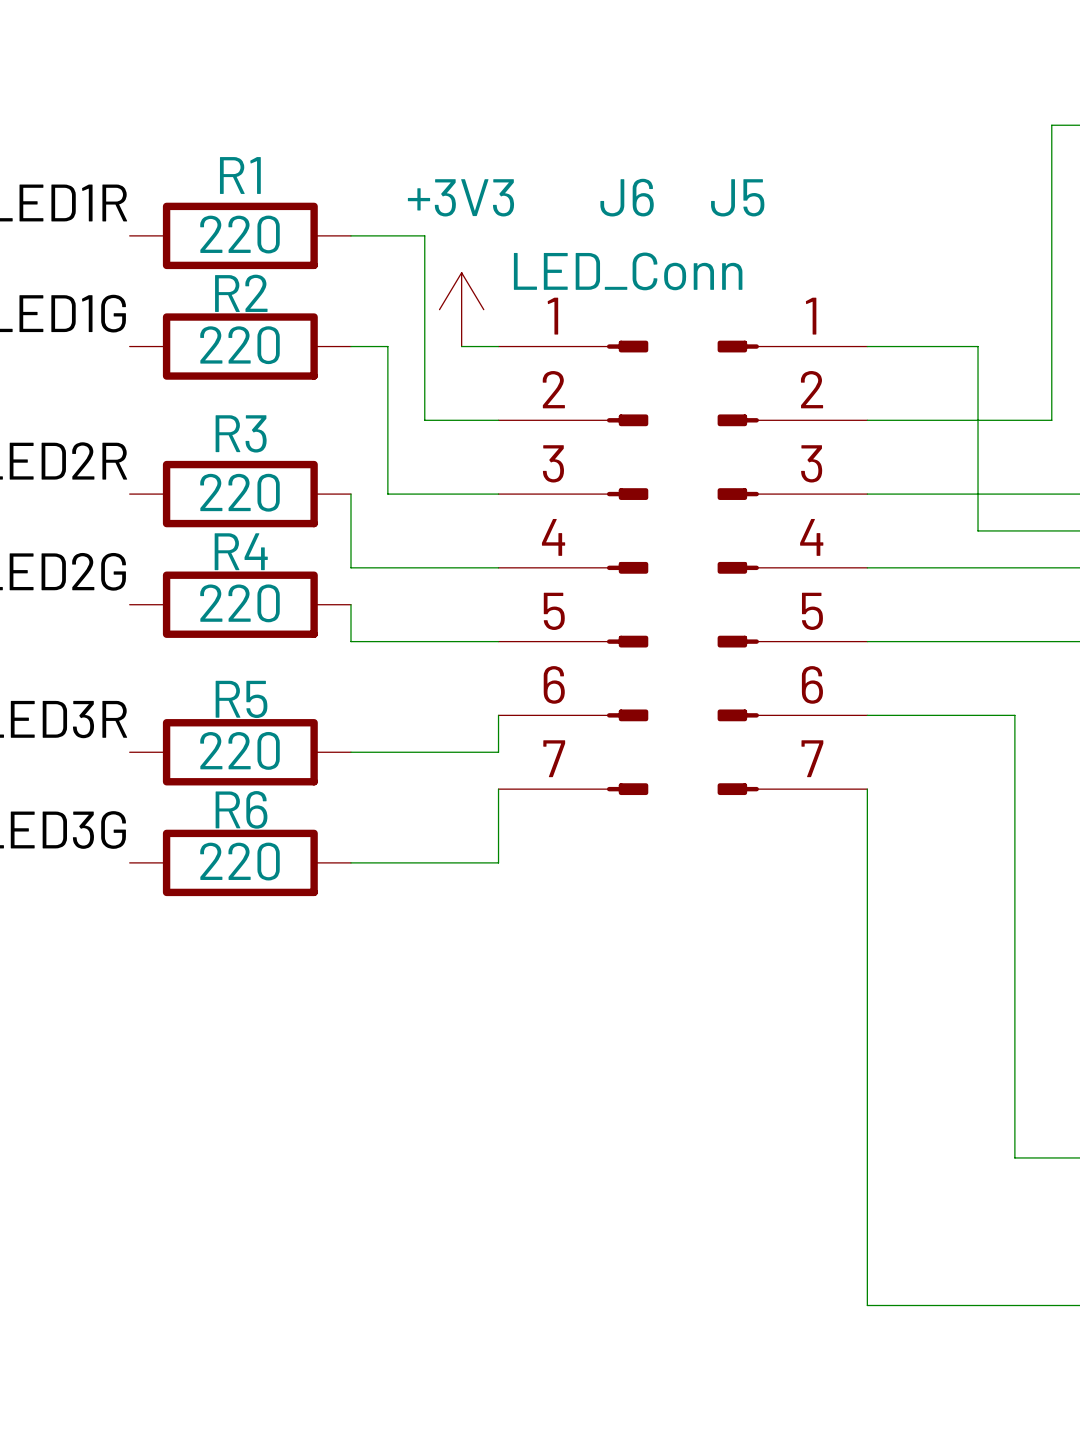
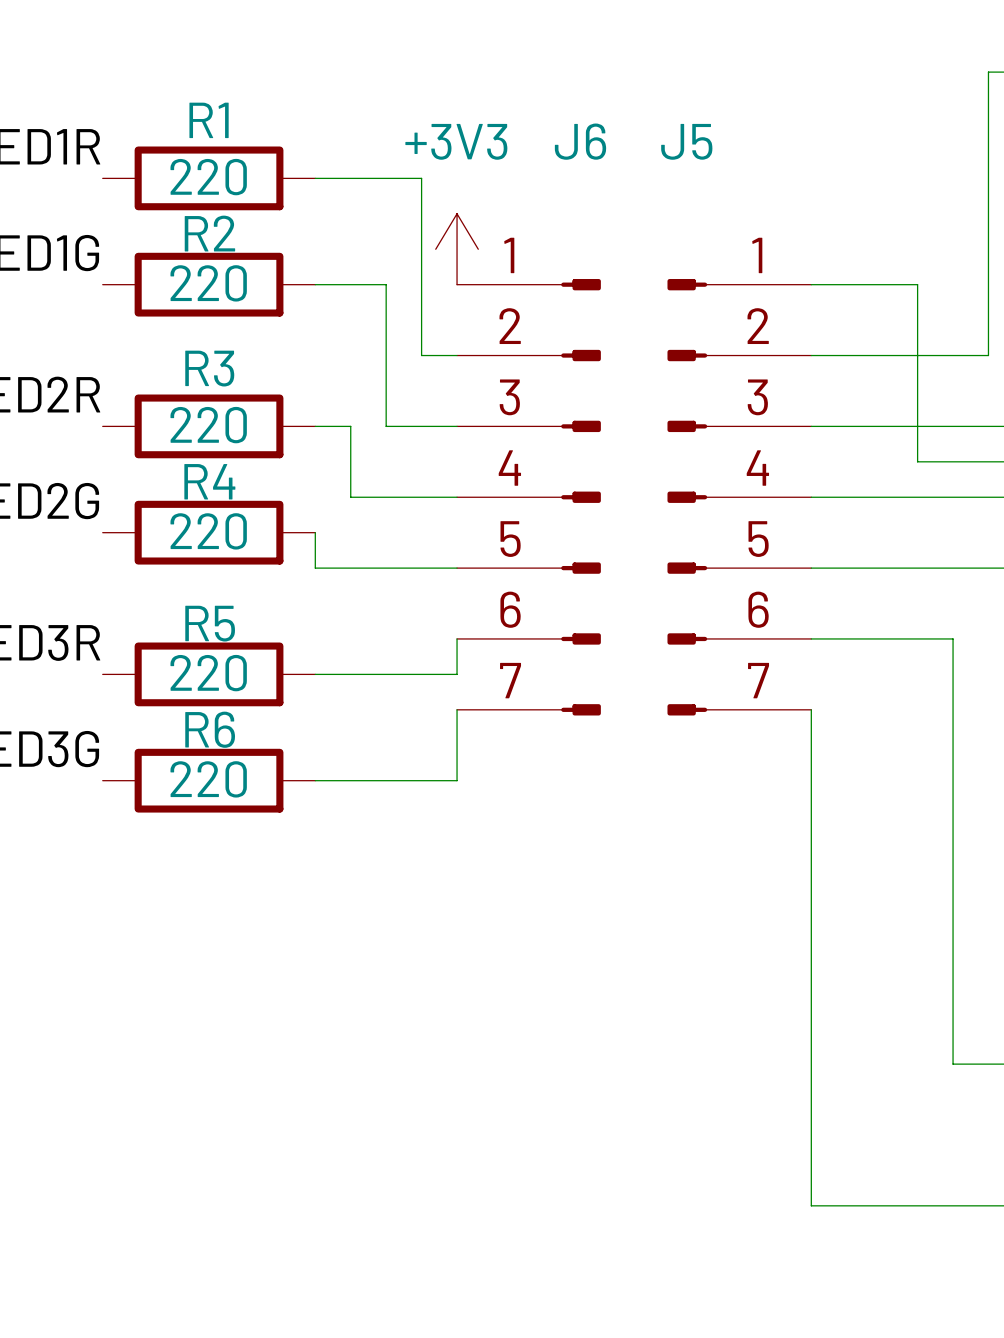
wire: (424, 235) (424, 346) -> (386, 178) (421, 178) (421, 355)
J6 value: LED_Conn (628, 271) -> none
power symbol position: +3V3 (461, 309) -> +3V3 (457, 249)
wire: (387, 346) (387, 494) (424, 494) -> (386, 355) (386, 426)
wire: (461, 346) (498, 346) -> (350, 284) (386, 284)
wire: (424, 420) (461, 420) -> none
wire: (351, 494) (351, 567) (387, 567) -> (315, 426) (350, 426) (350, 497)

